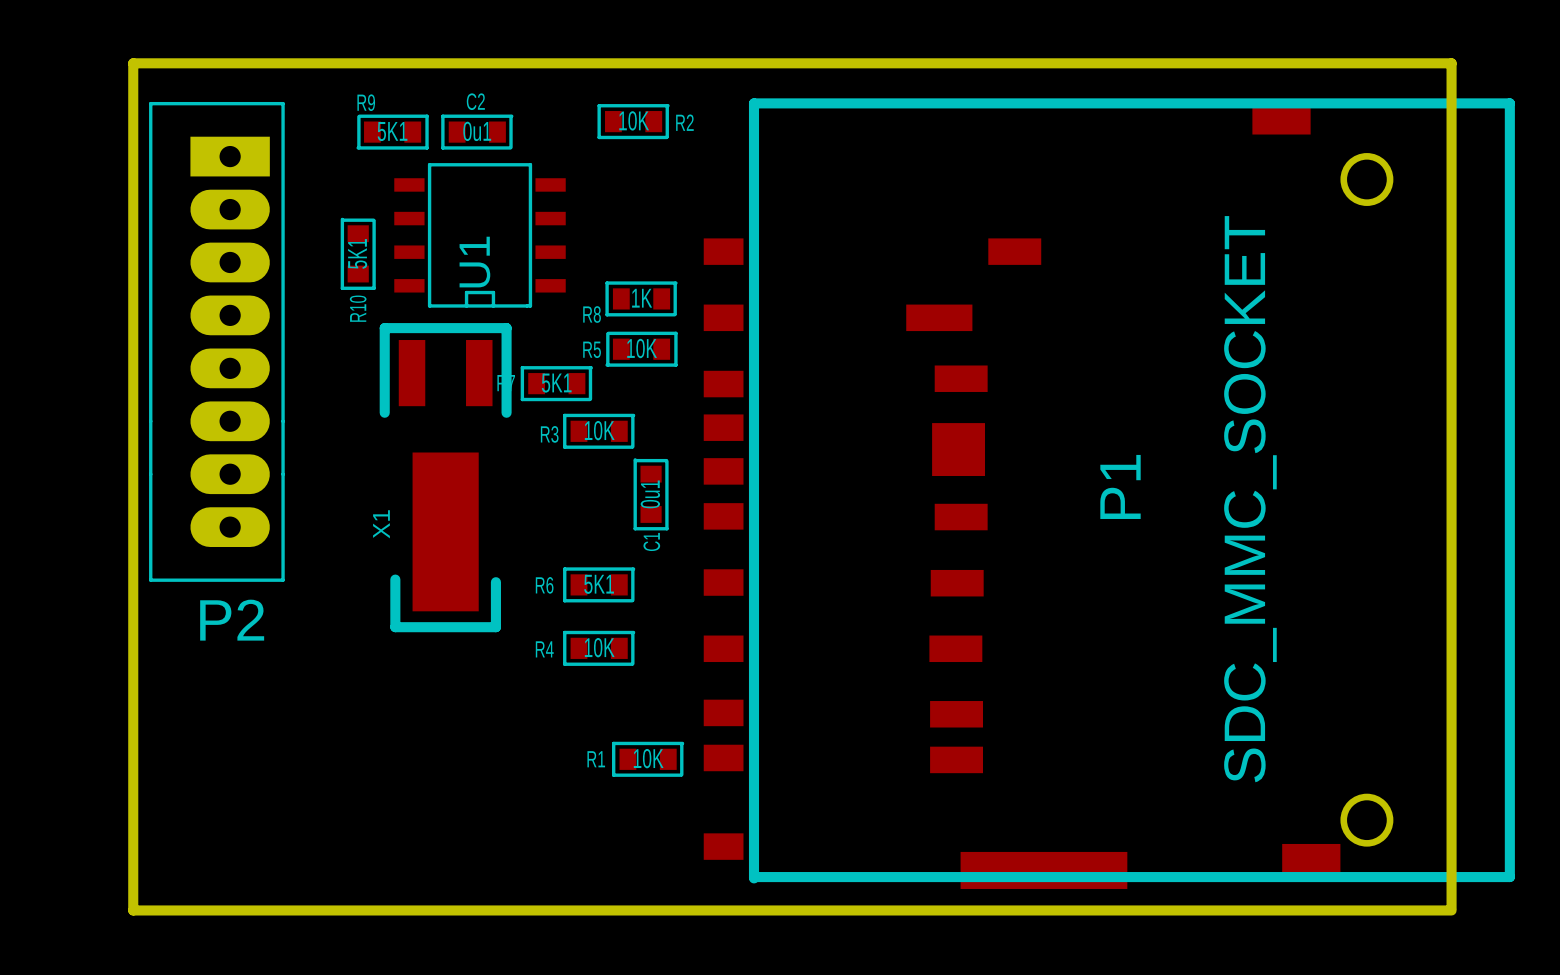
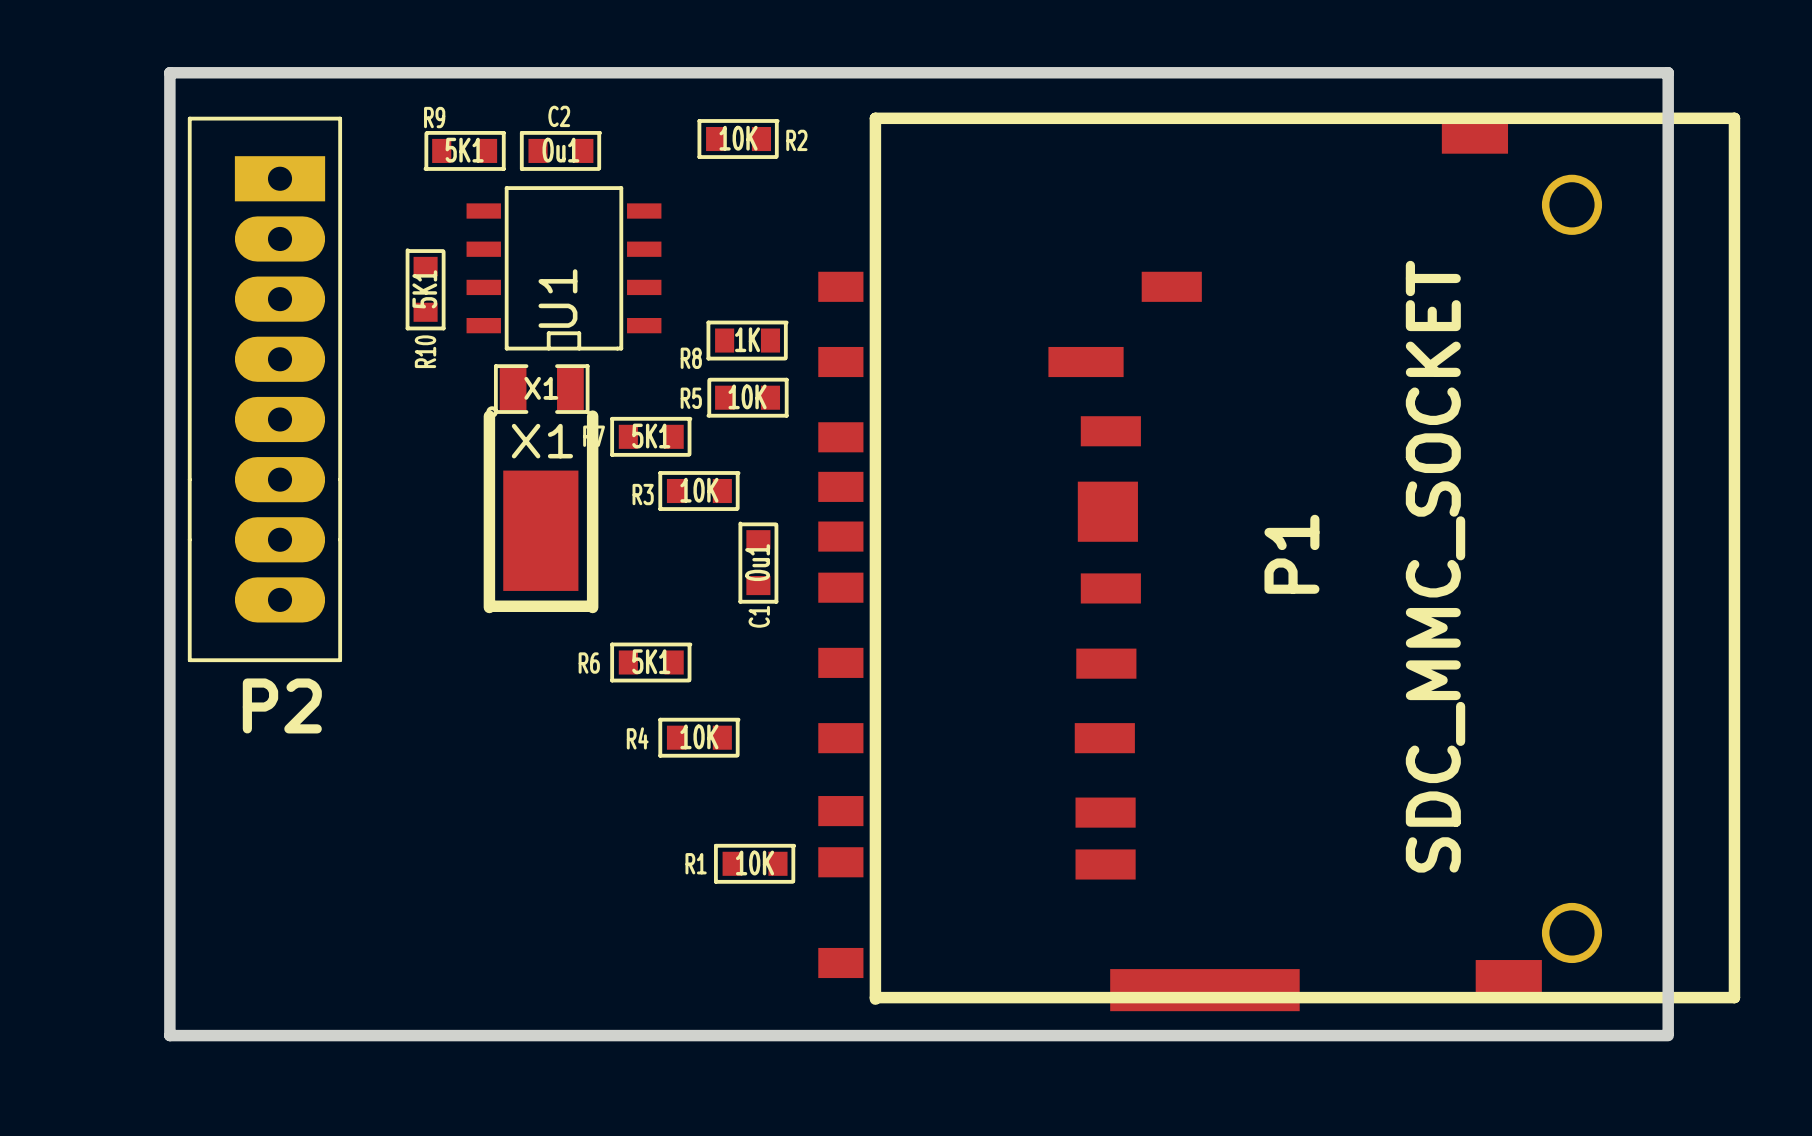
X1 footprint: [379, 323, 512, 633] -> [486, 364, 590, 418]
line: none -> (489, 416) (489, 607)
line: none -> (592, 416) (592, 607)
text: none -> X1 (542, 441)
part: none -> (540, 530)
X1 name position: X1 (381, 524) -> X1 (541, 388)
line: none -> (493, 606) (590, 606)
R6 position: (599, 584) -> (651, 662)

